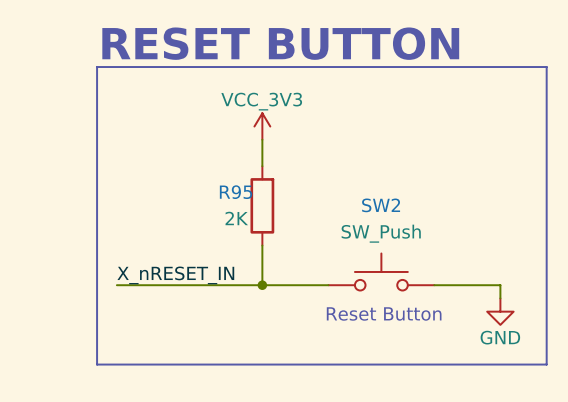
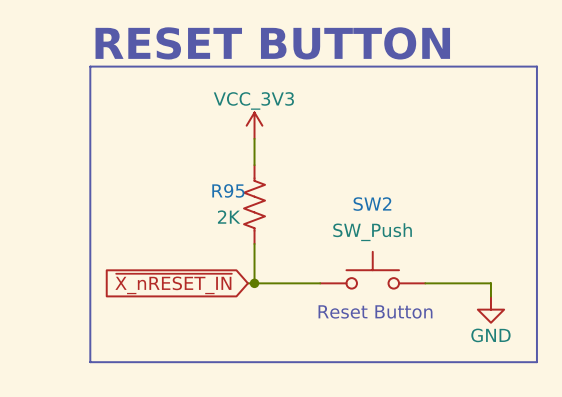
R95 symbol: [250, 166, 275, 246] -> [244, 165, 266, 244]
label: X_nRESET_IN (175, 275) -> none
wire: (116, 285) (255, 285) -> none
global label: none -> ~{X_nRESET_IN} (173, 283)

